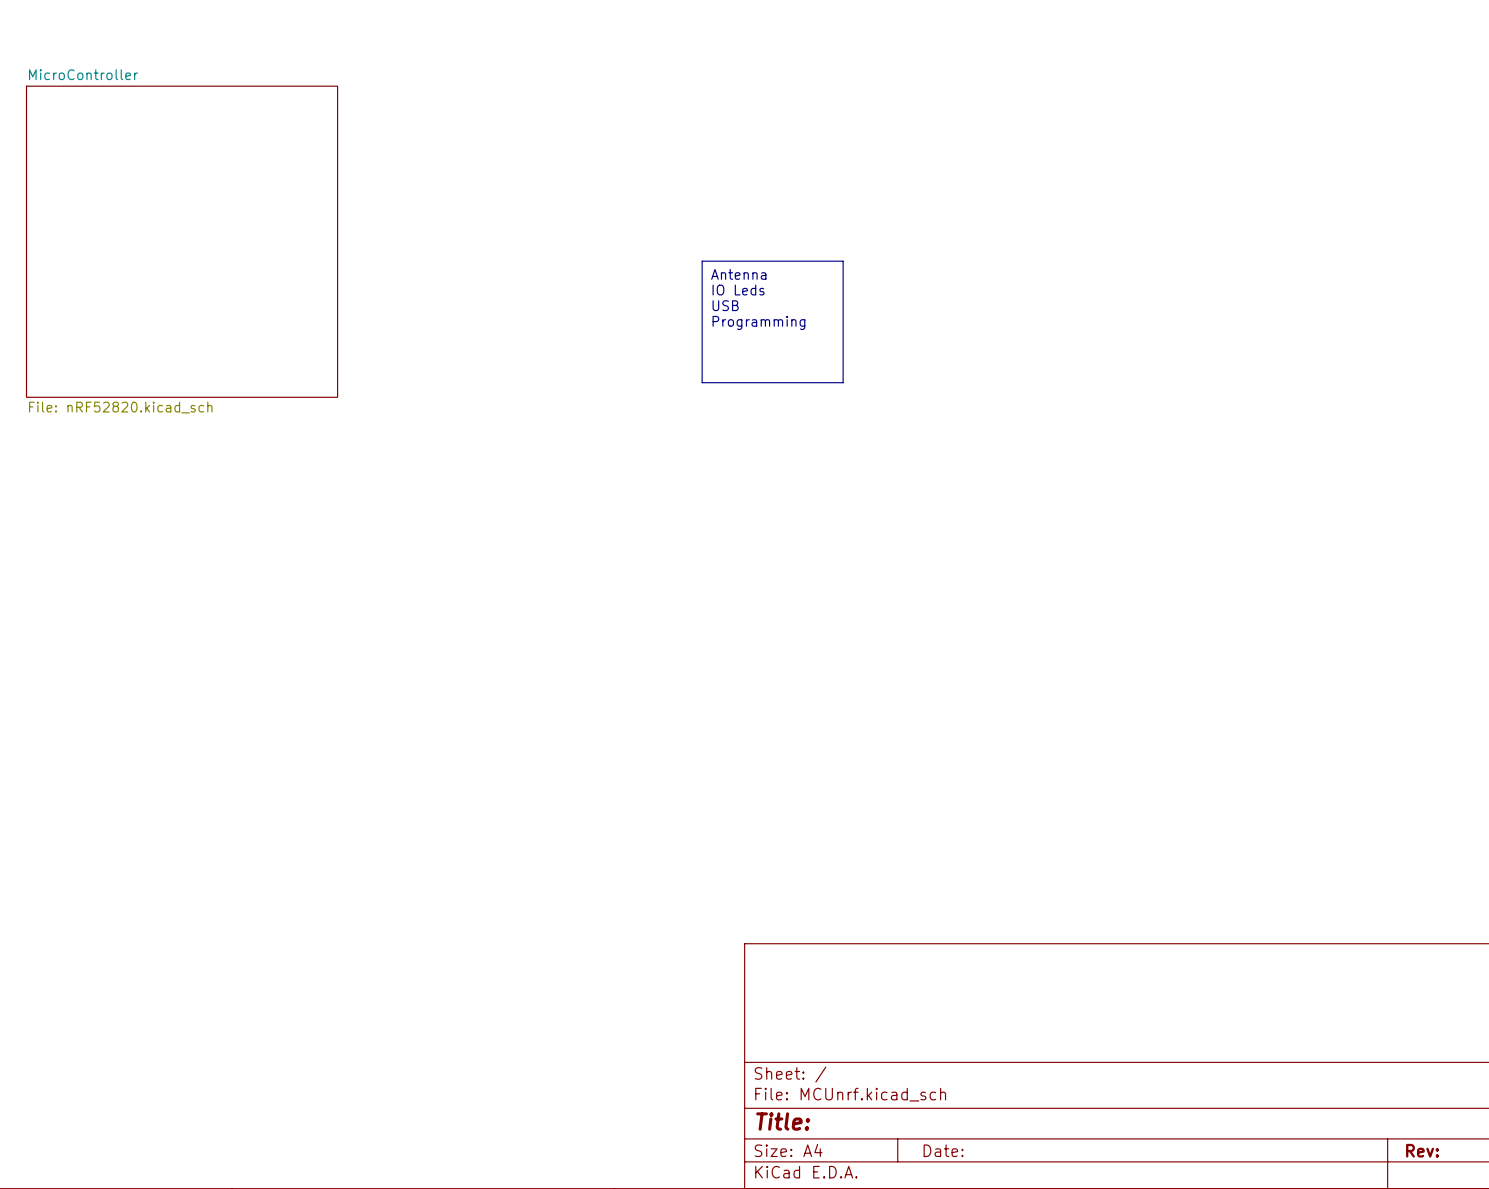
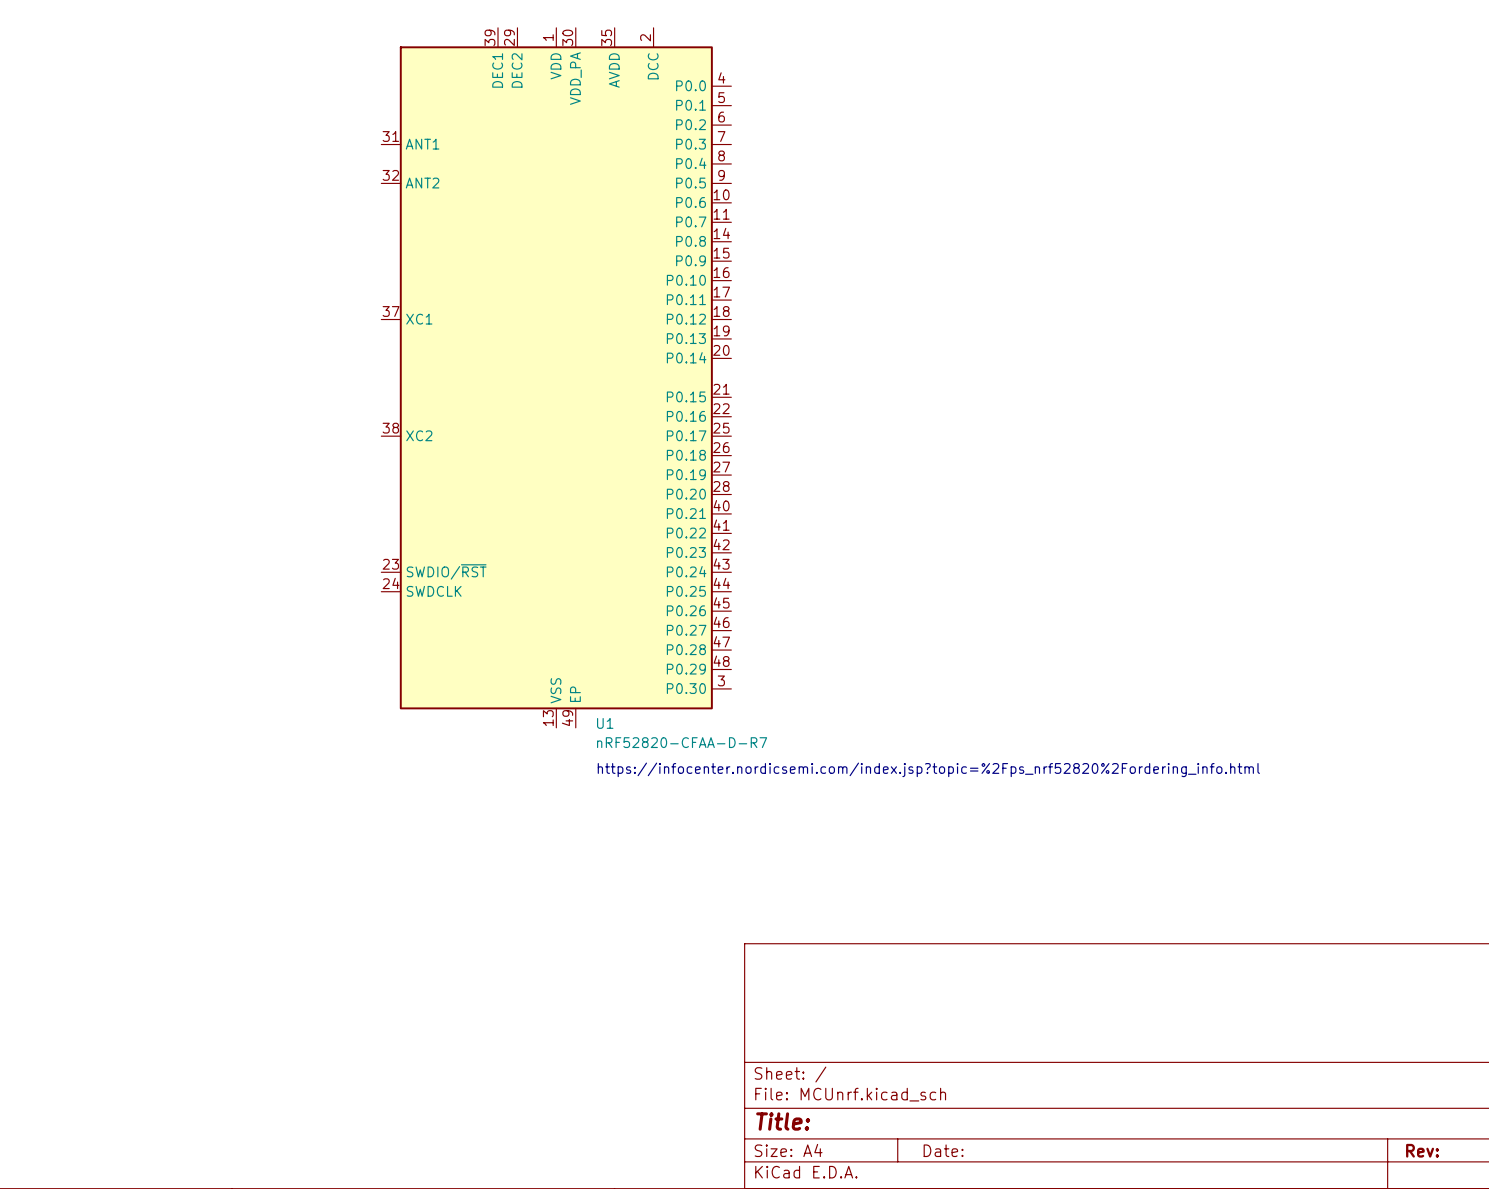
sheet MicroController: File: nRF52820.kicad_sch (182, 241) -> none
line: (702, 261) (843, 261) (843, 382) (702, 382) (702, 261) -> none
text: Antenna (738, 274) -> none
text: IO Leds (738, 290) -> none
text: USB (725, 305) -> none
text: Programming (758, 322) -> none
U1: none -> nRF52820-CFAA-D-R7 (556, 377)
text: none -> https://infocenter.nordicsemi.com/index.jsp?topic=%2Fps_nrf52820%2Fordering_info.html (928, 769)

